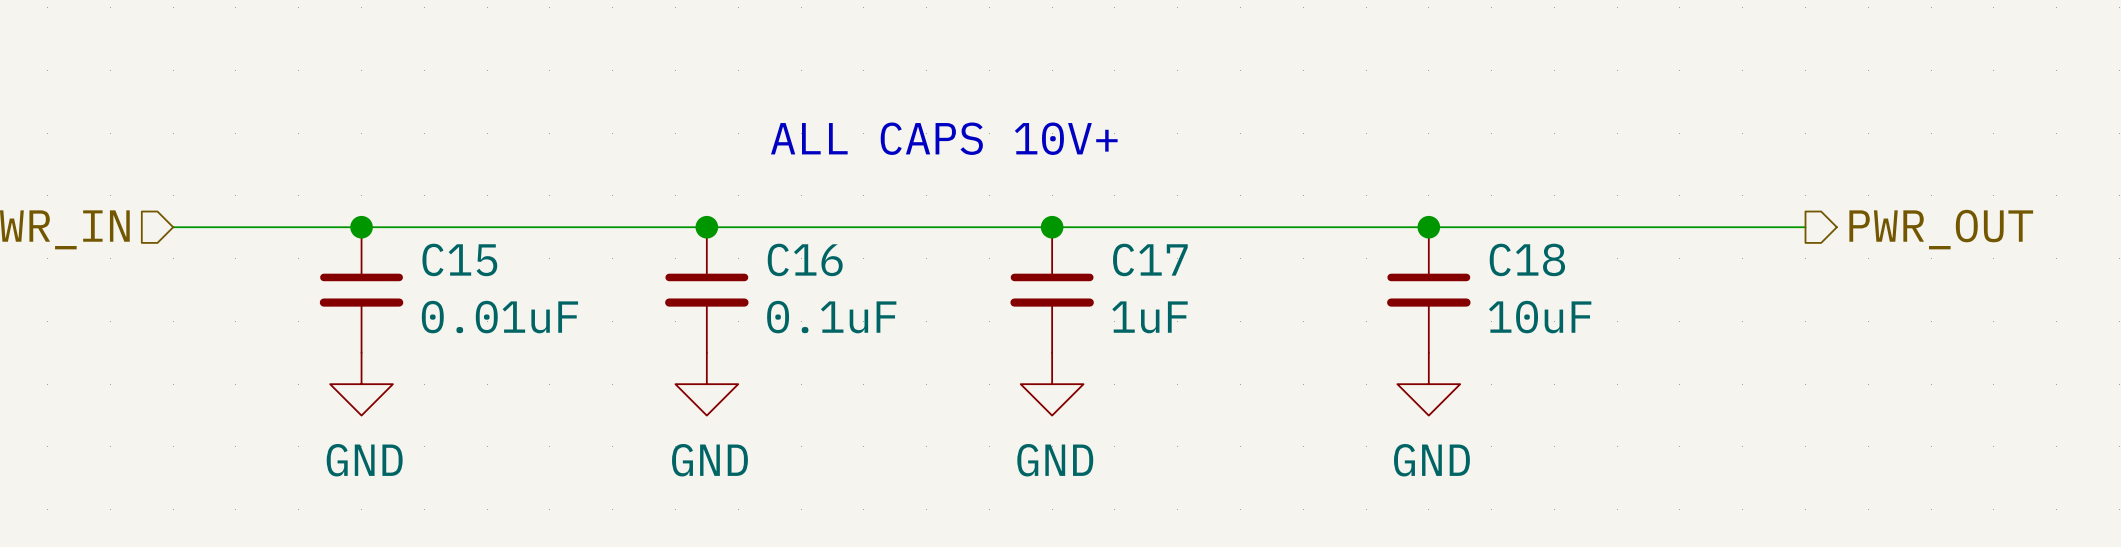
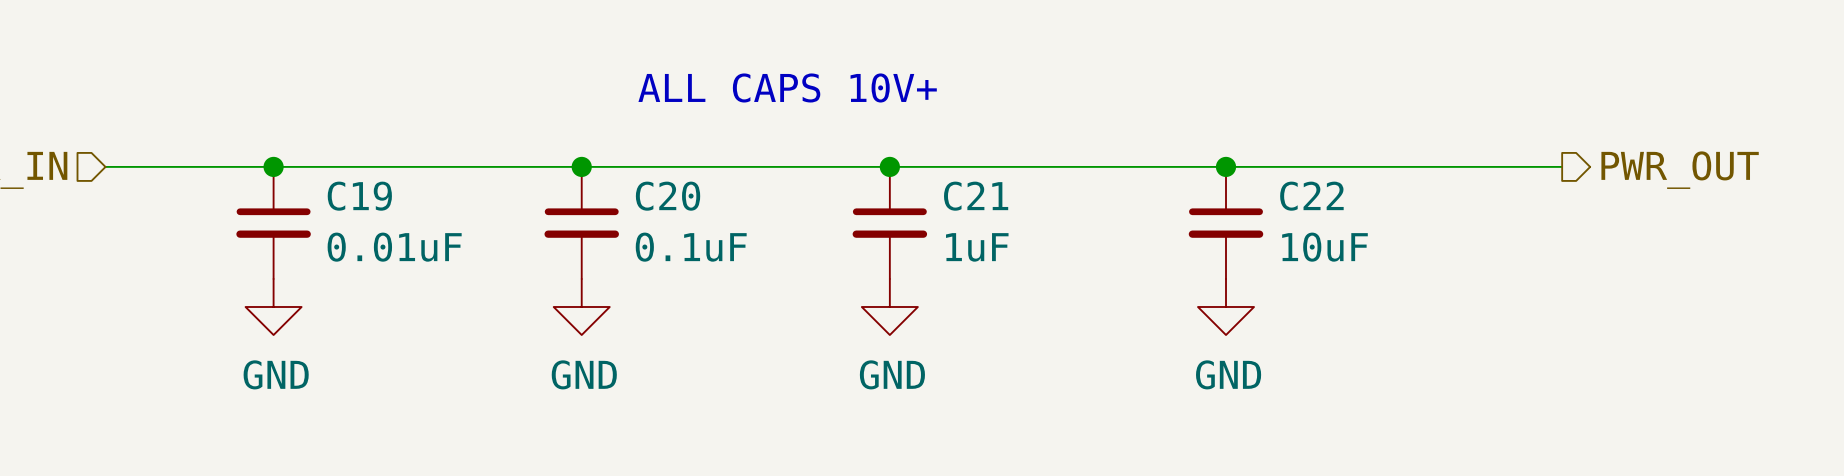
C15 name: C15 (459, 259) -> C19 (359, 196)
C16 name: C16 (805, 259) -> C20 (668, 196)
C17 name: C17 (1150, 259) -> C21 (976, 196)
C18 name: C18 (1527, 259) -> C22 (1311, 196)

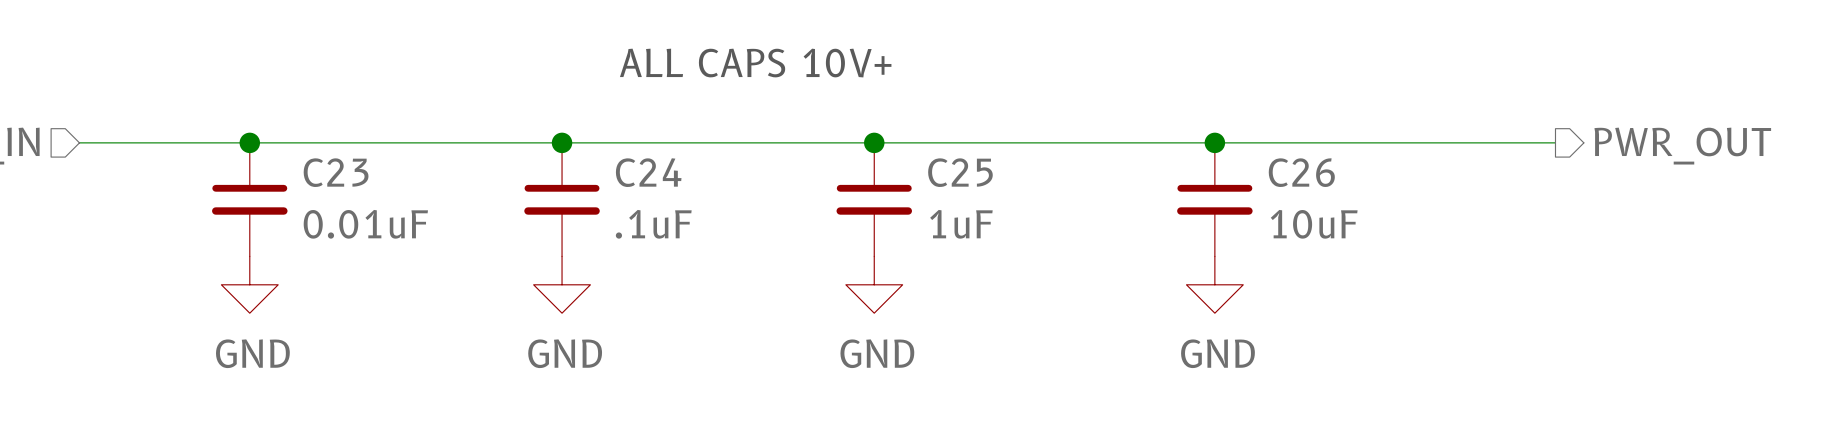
C19 name: C19 (359, 196) -> C23 (336, 172)
C20 name: C20 (668, 196) -> C24 (648, 172)
C21 name: C21 (976, 196) -> C25 (960, 172)
C22 name: C22 (1311, 196) -> C26 (1301, 172)
C20 value: 0.1uF (691, 247) -> .1uF (653, 224)

